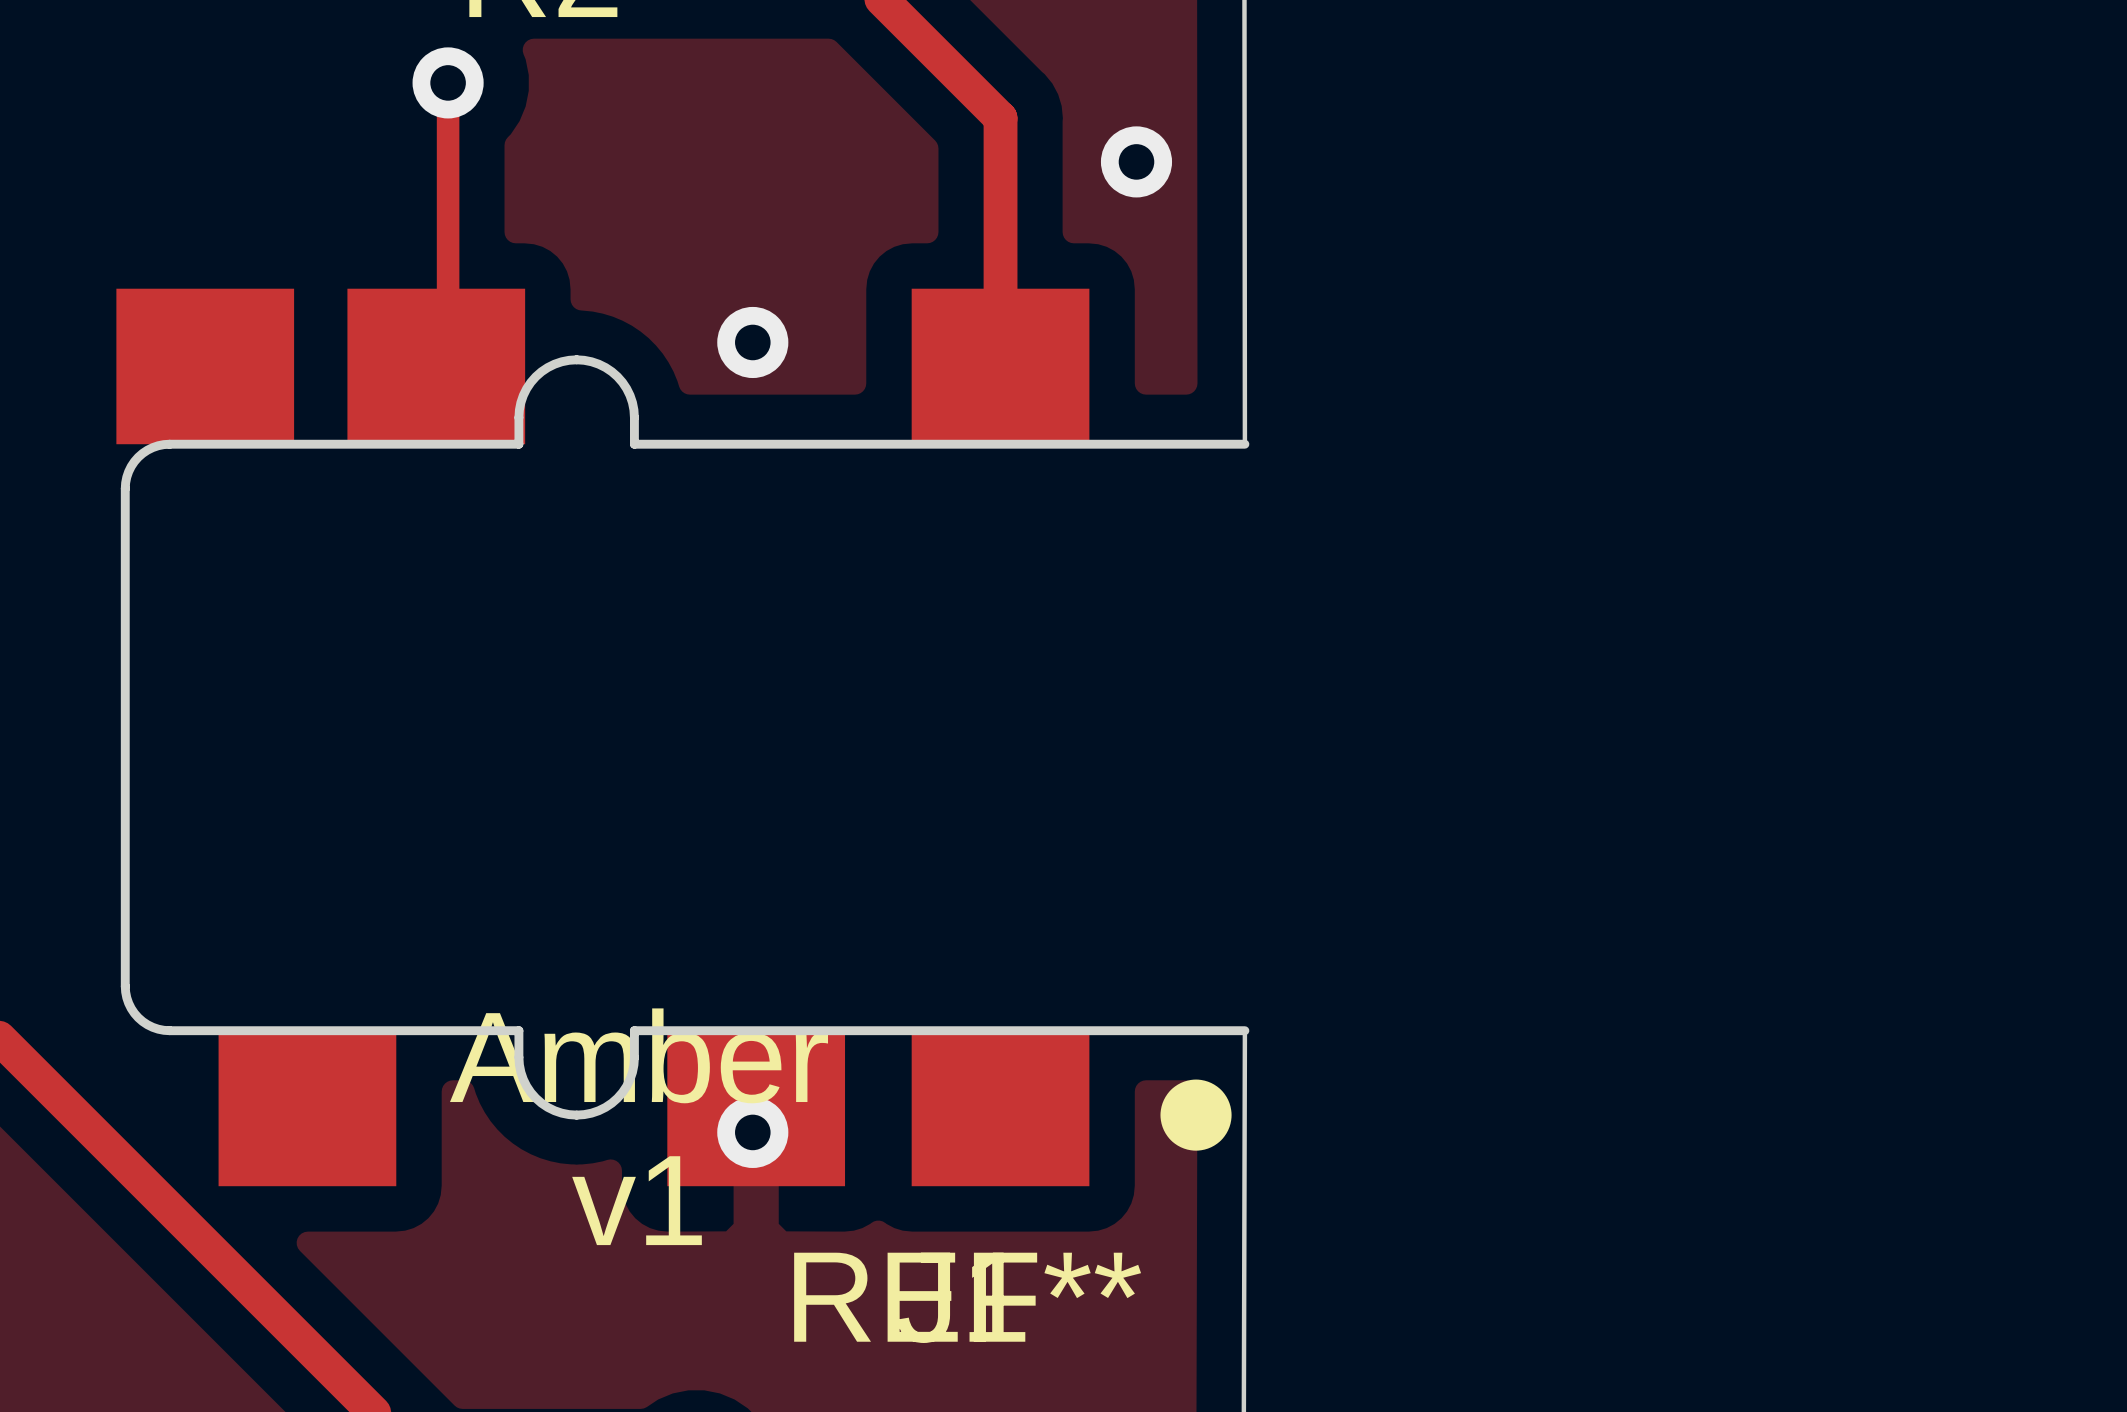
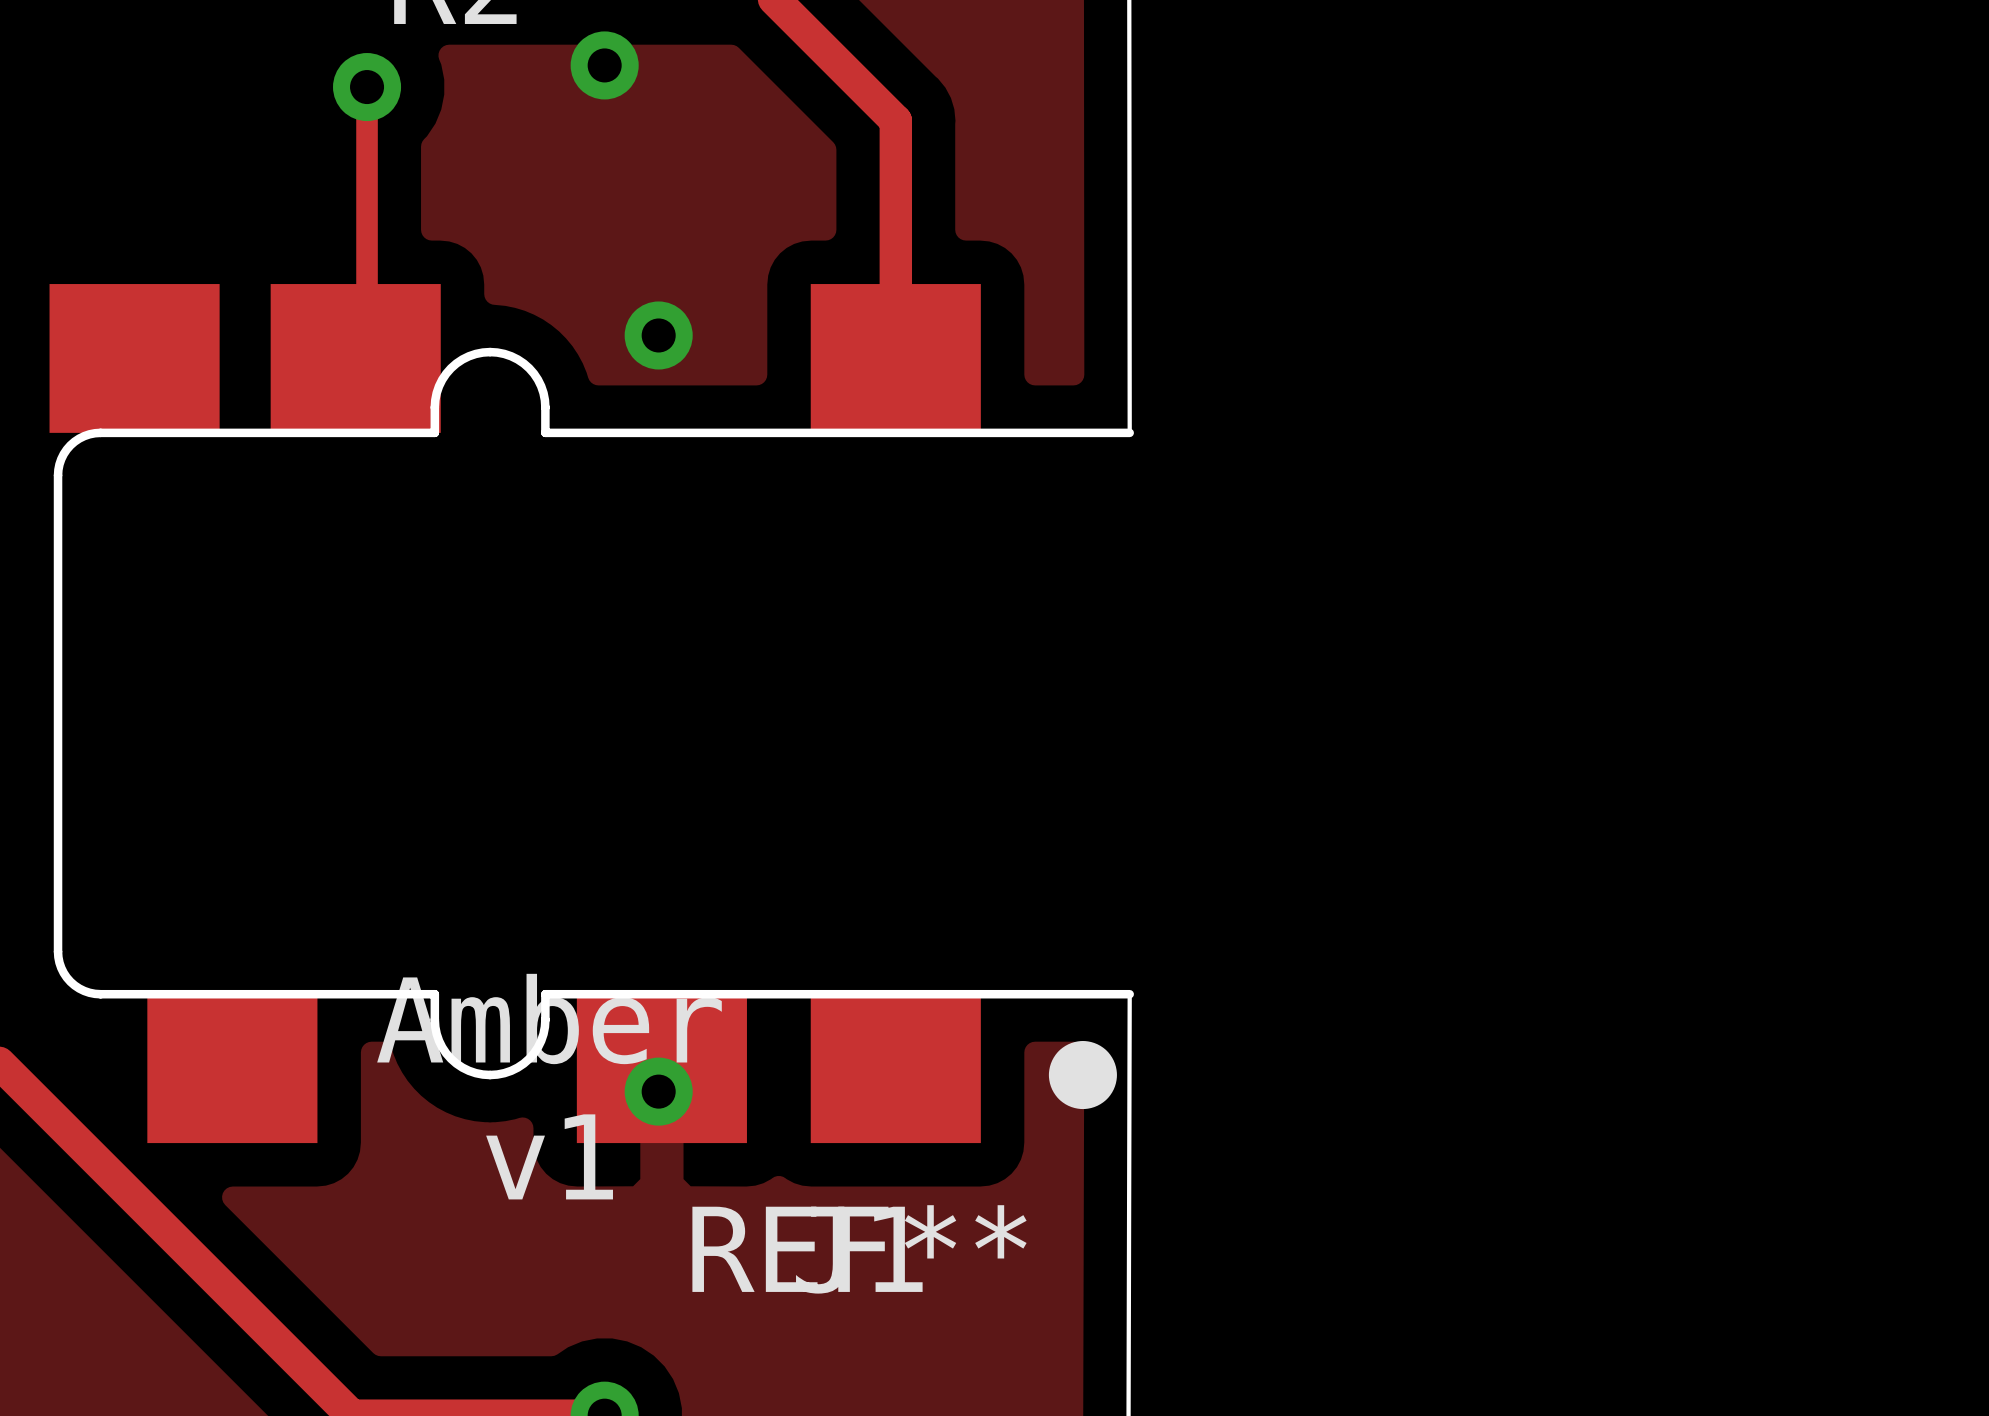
via position: (1136, 161) -> (604, 65)

